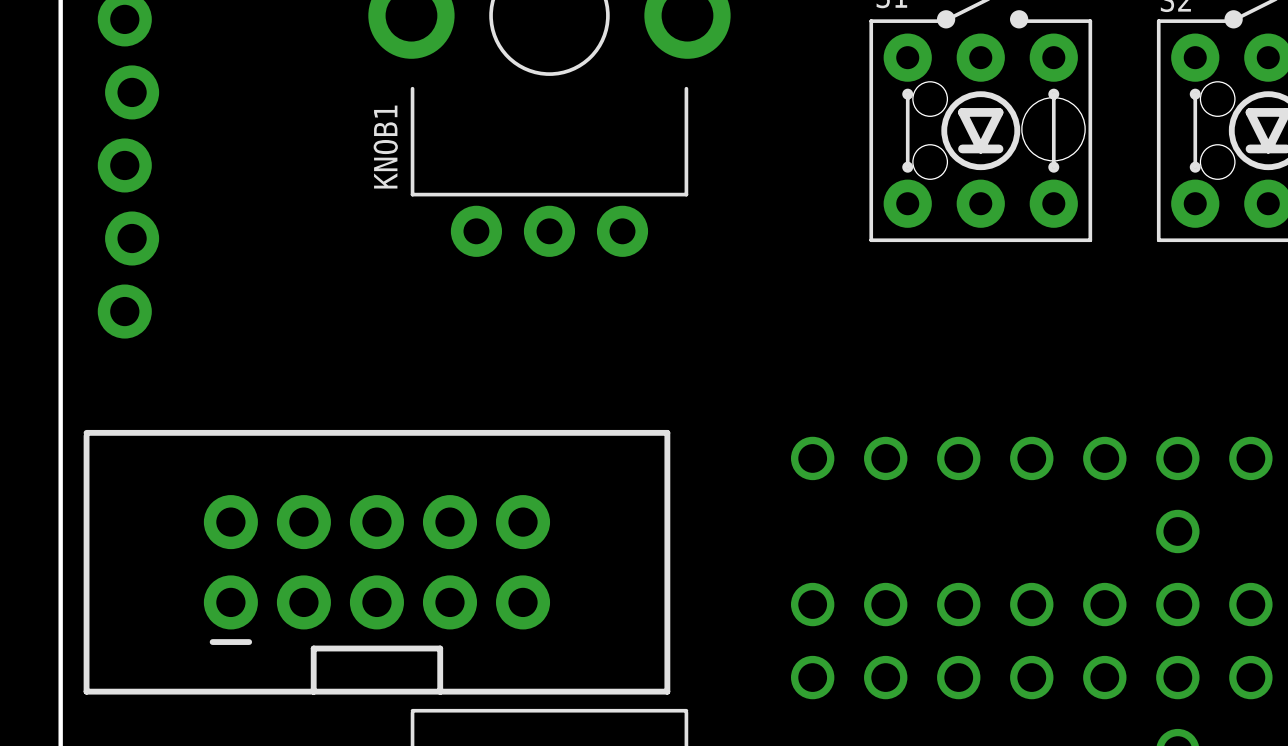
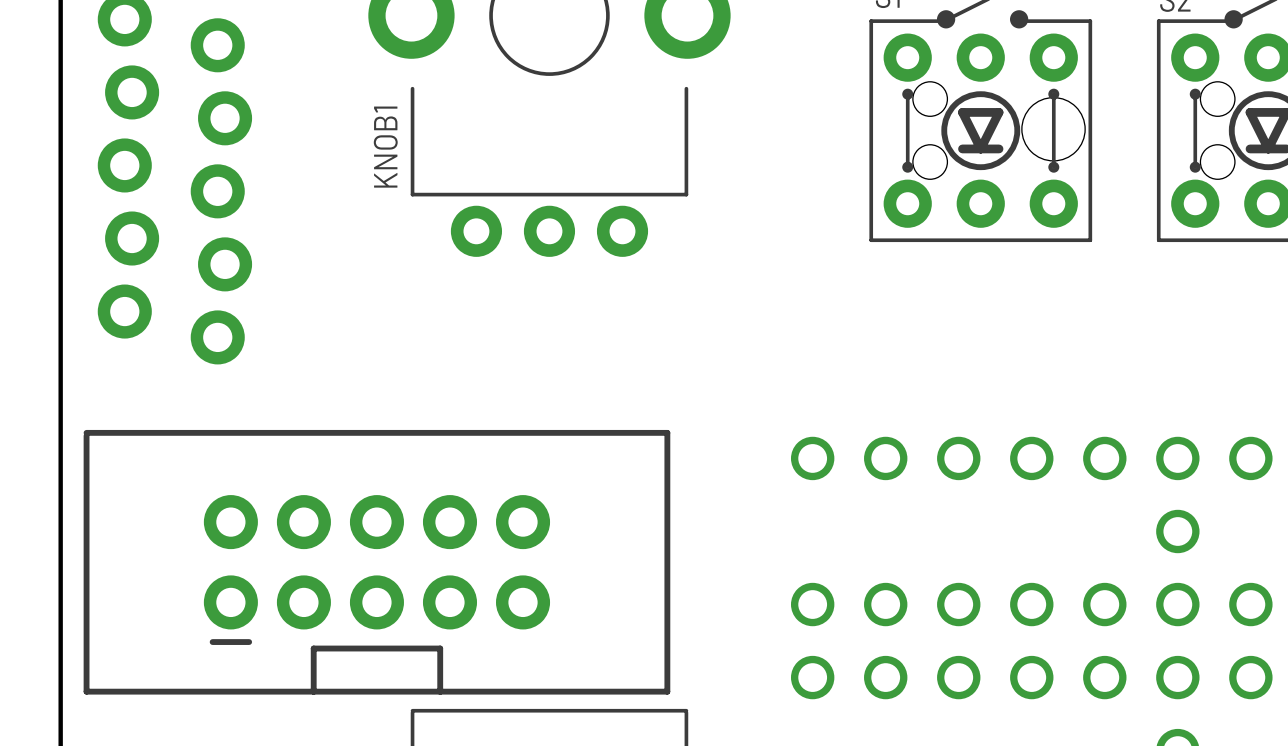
part: none -> (221, 191)

